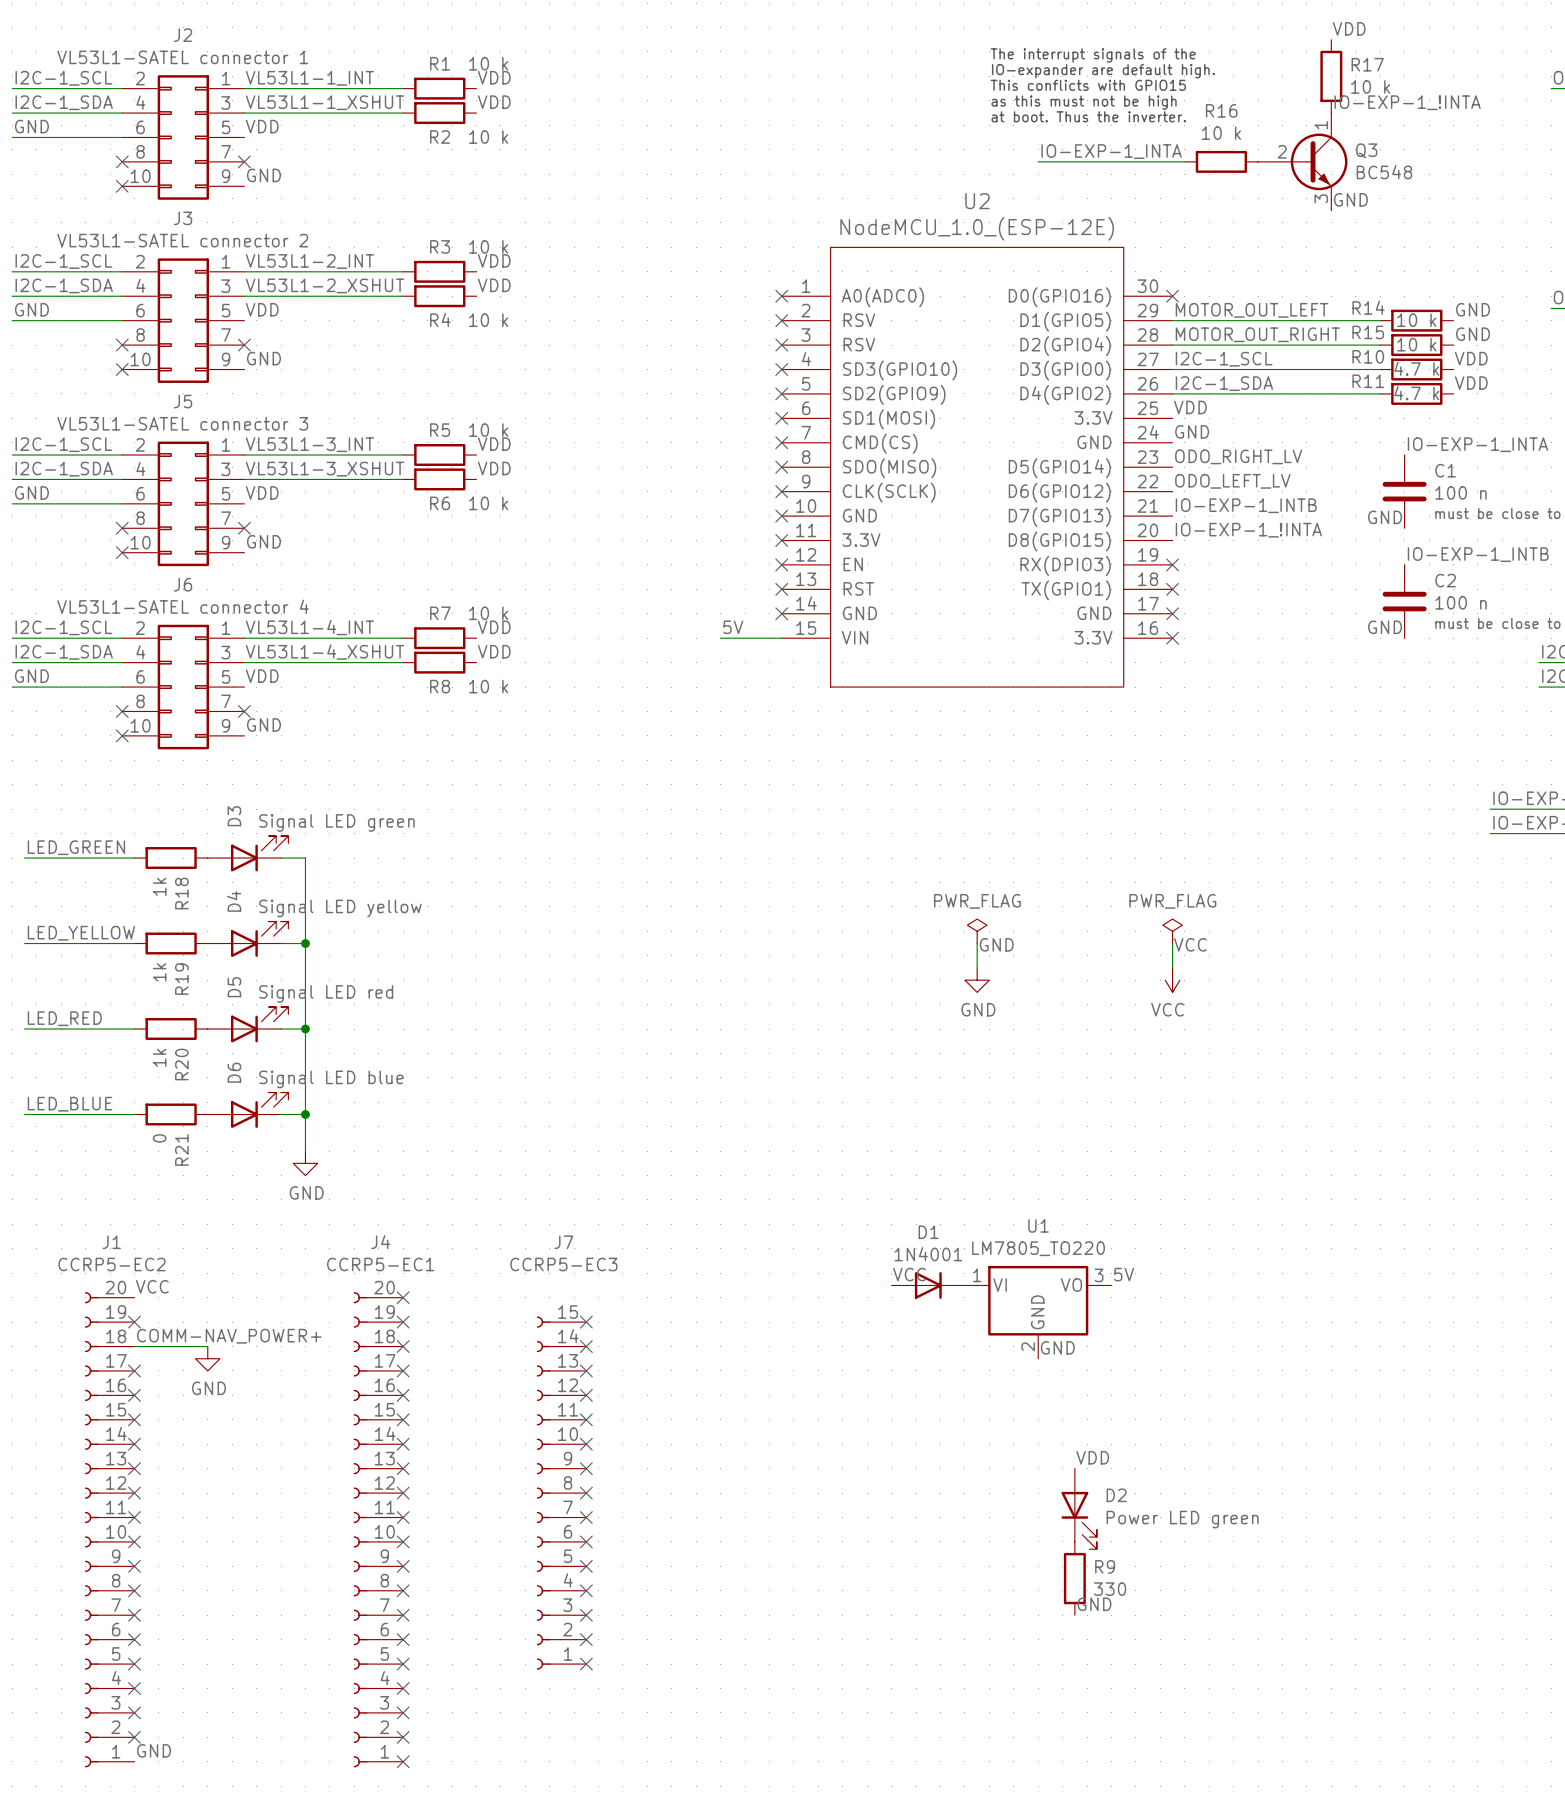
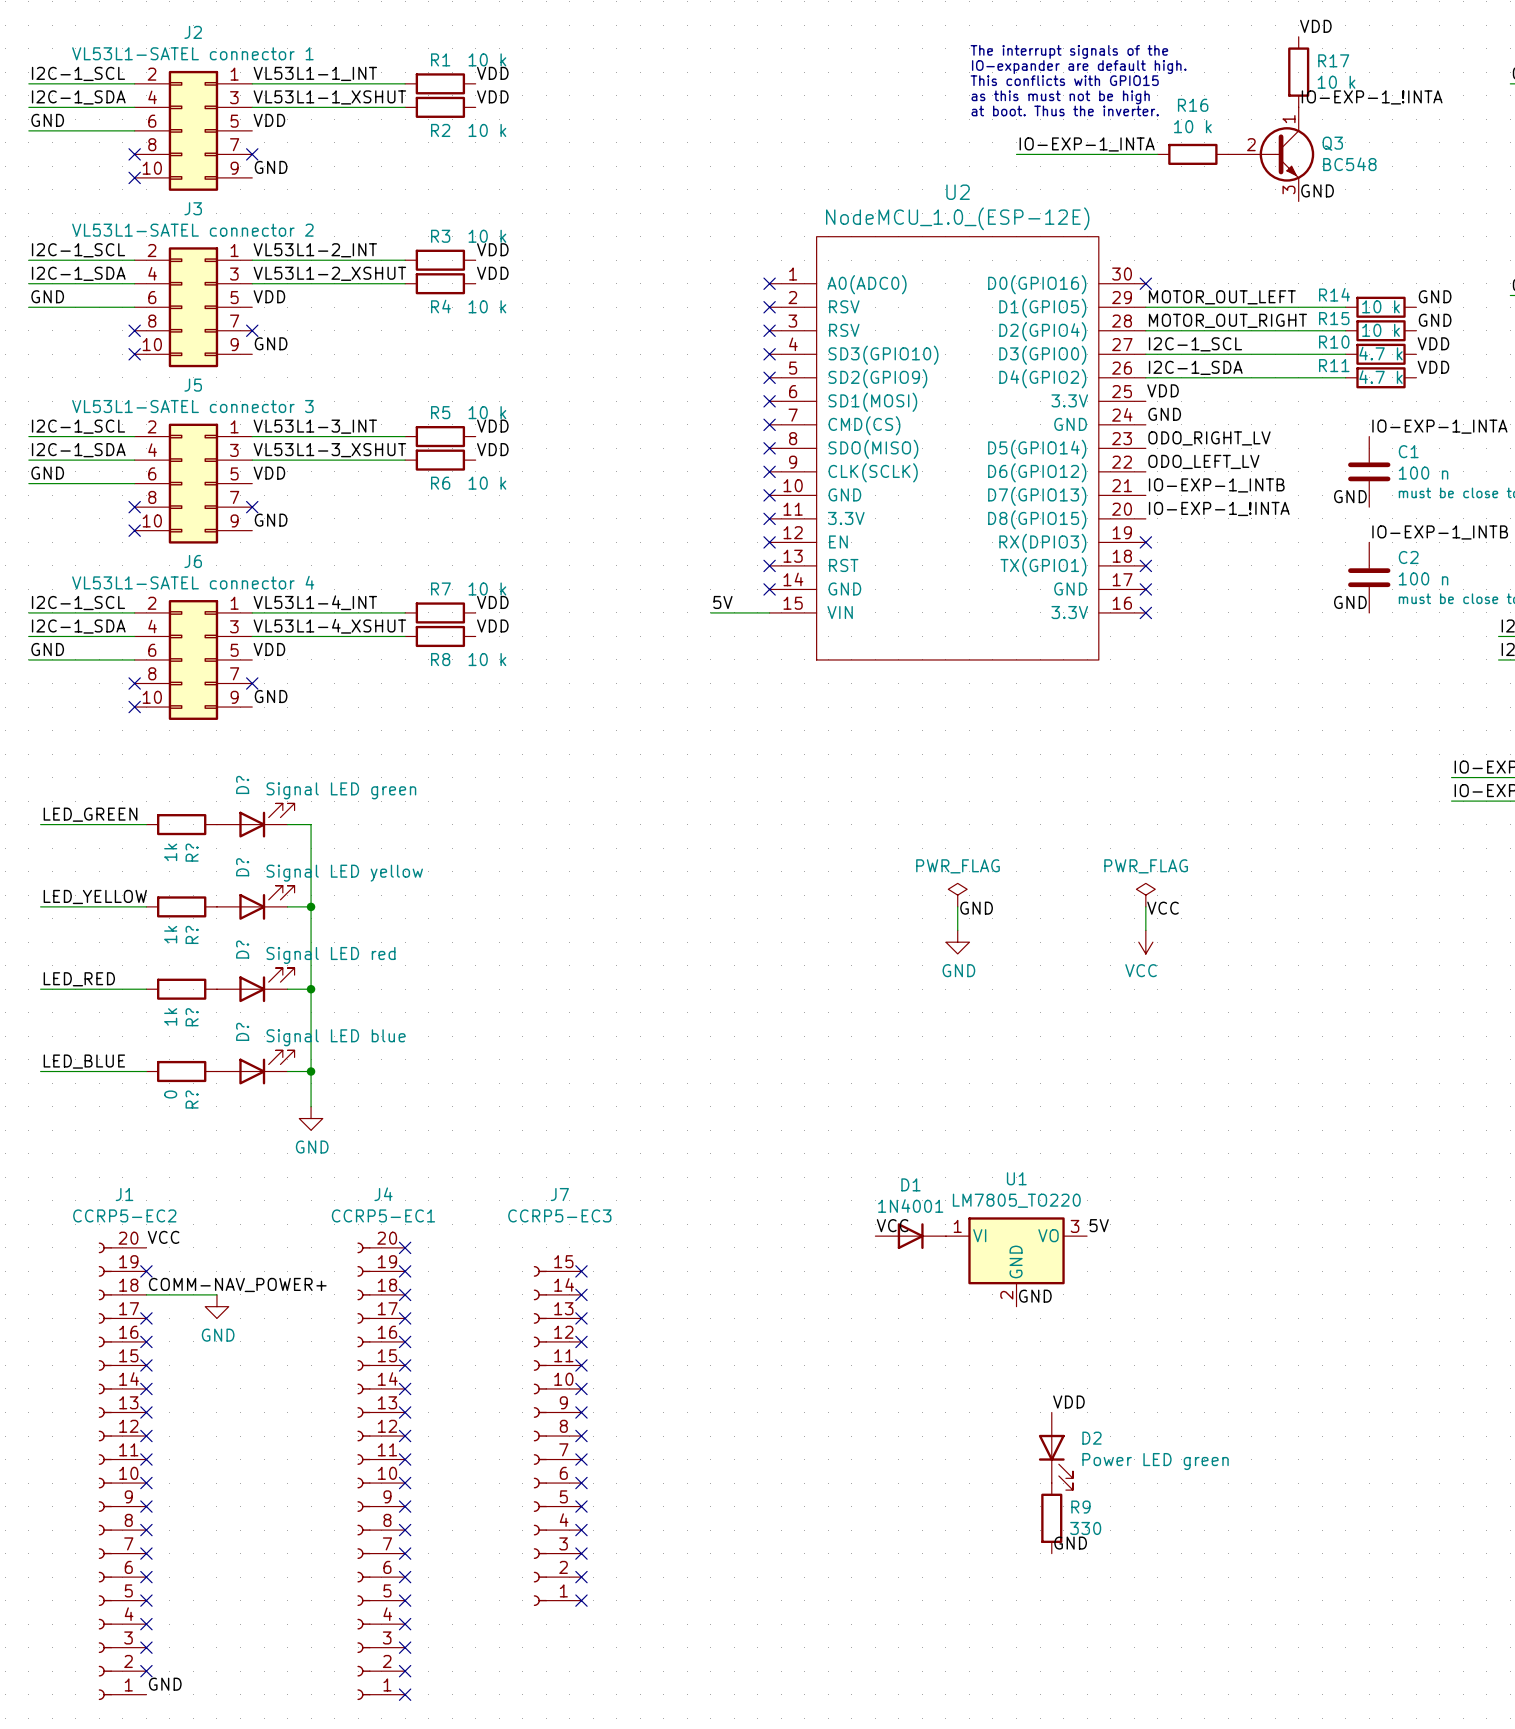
D3 name: D3 (234, 816) -> D? (242, 784)
R18 name: R18 (181, 893) -> R? (192, 852)
D4 name: D4 (234, 901) -> D? (242, 867)
R19 name: R19 (181, 979) -> R? (192, 934)
D5 name: D5 (234, 987) -> D? (242, 949)
R20 name: R20 (181, 1064) -> R? (192, 1017)
D6 name: D6 (234, 1072) -> D? (242, 1031)
R21 name: R21 (181, 1150) -> R? (192, 1099)

